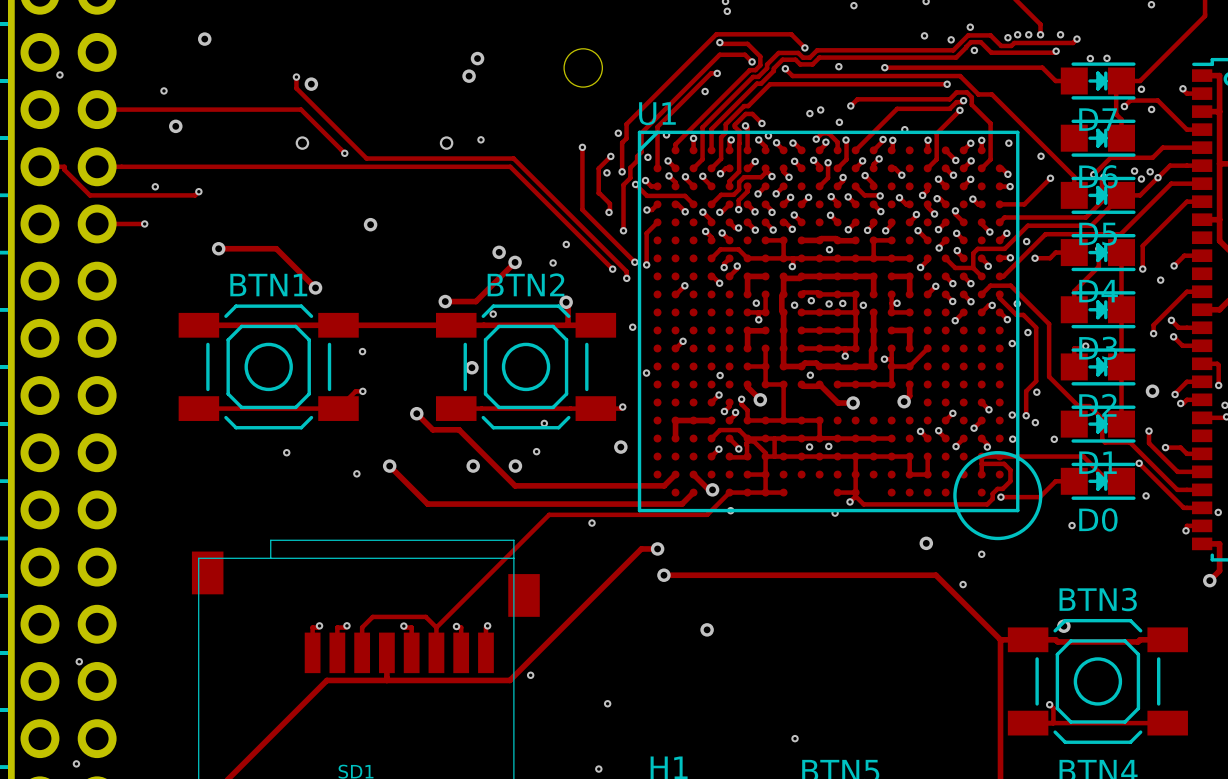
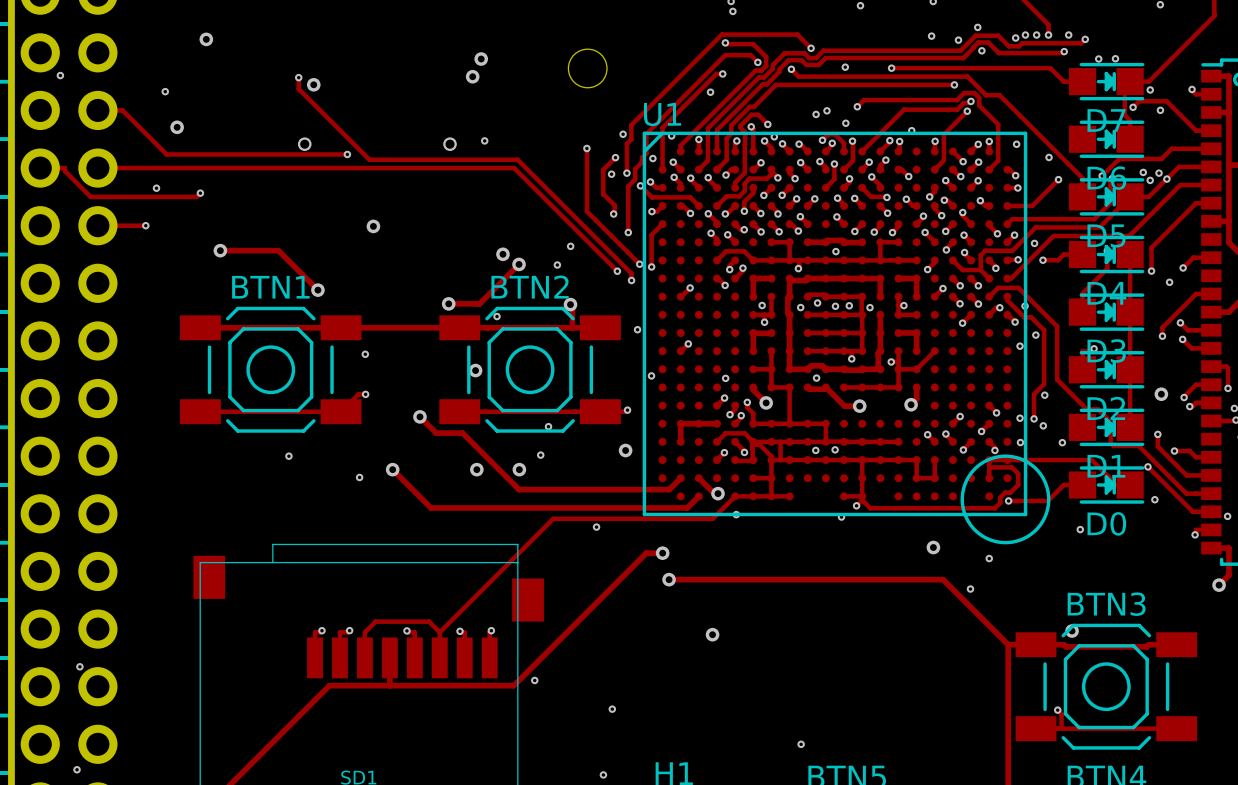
track: (121, 109) (301, 109) (344, 153) -> (122, 110) (166, 154) (347, 154)

